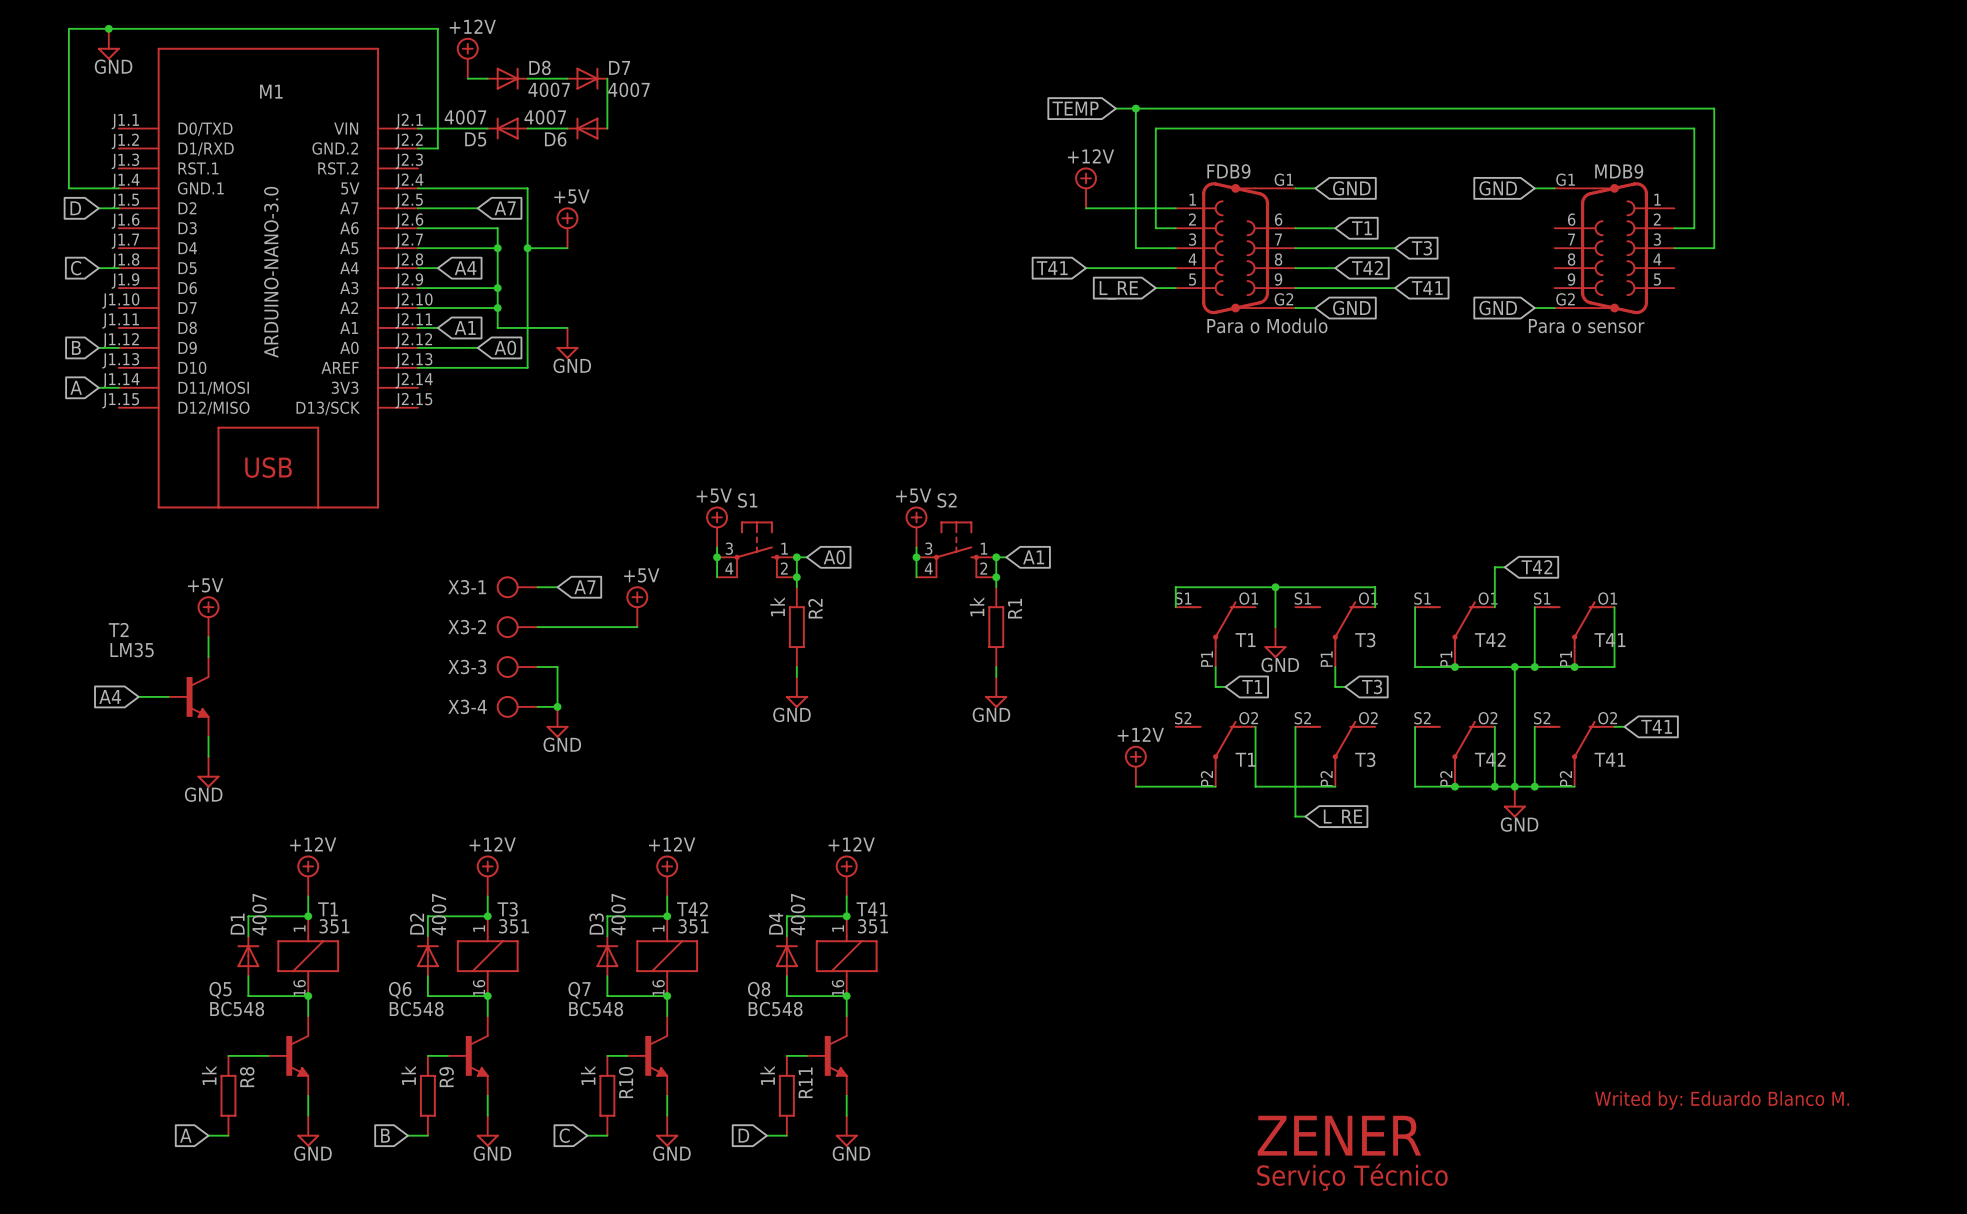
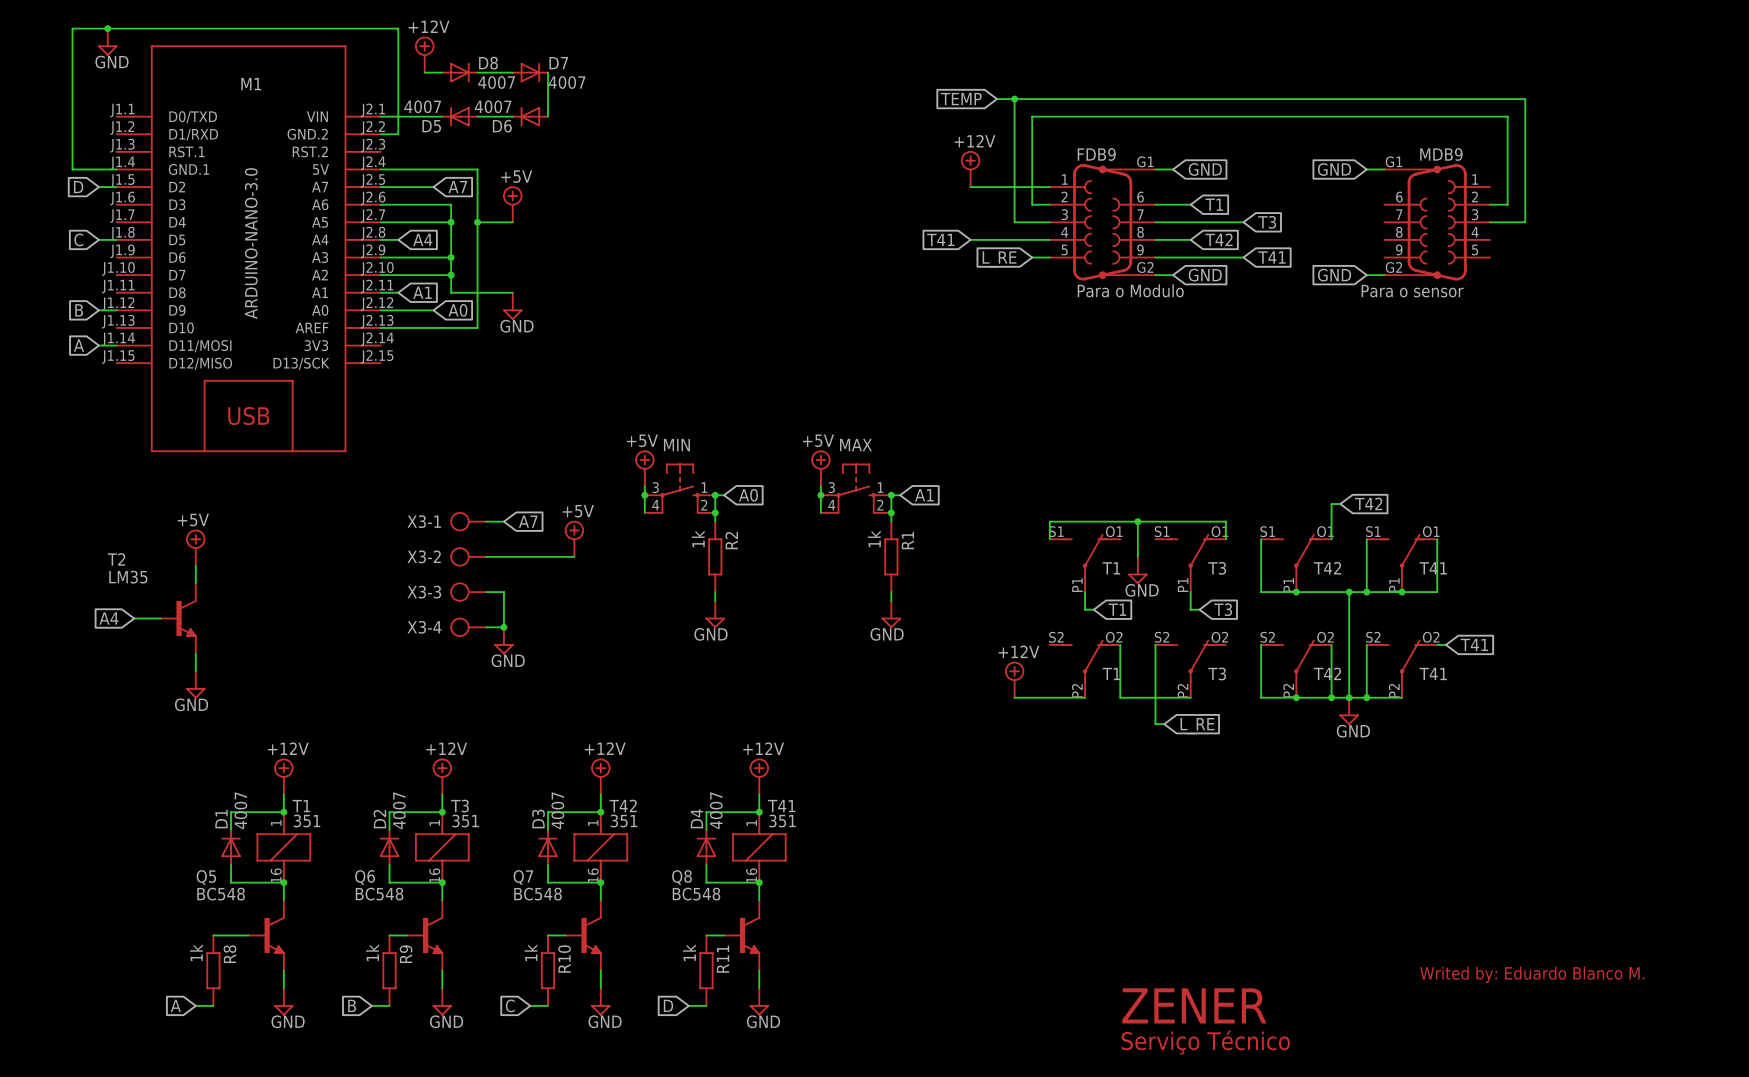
S1 name: S1 (747, 500) -> MIN (676, 445)
S2 name: S2 (947, 500) -> MAX (856, 445)

